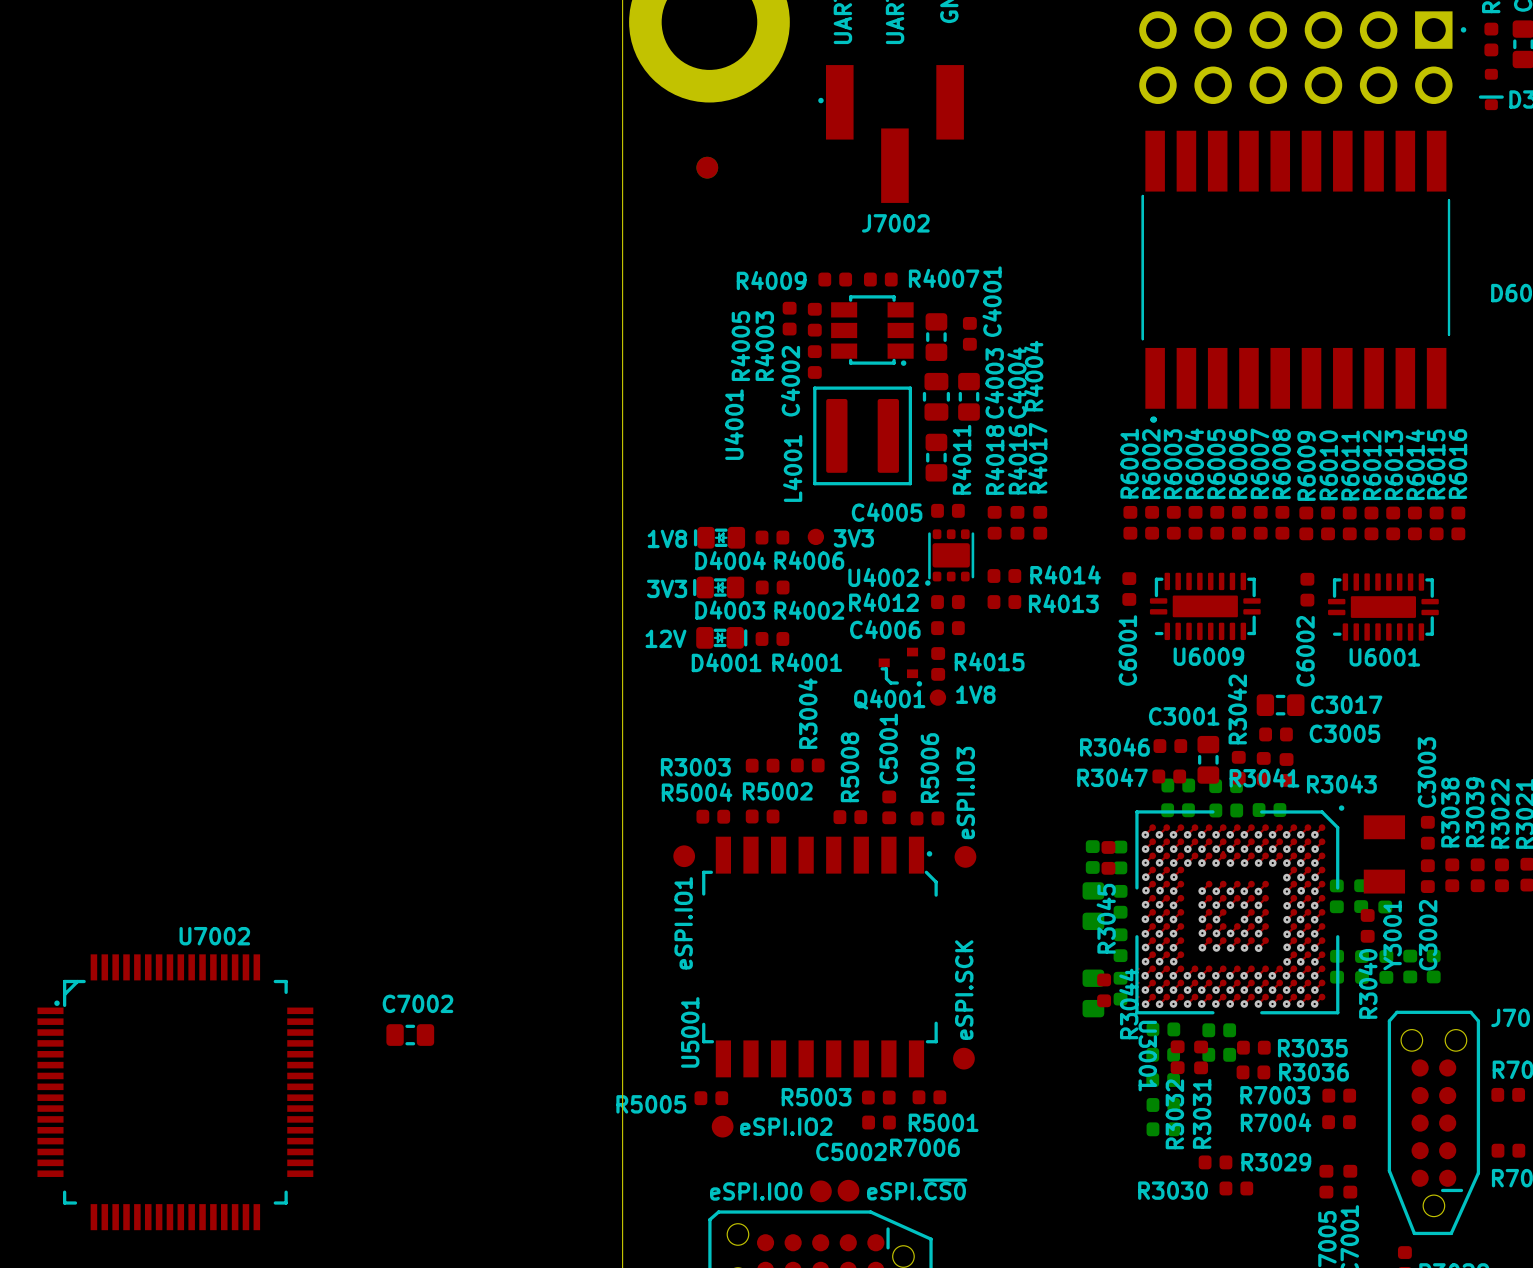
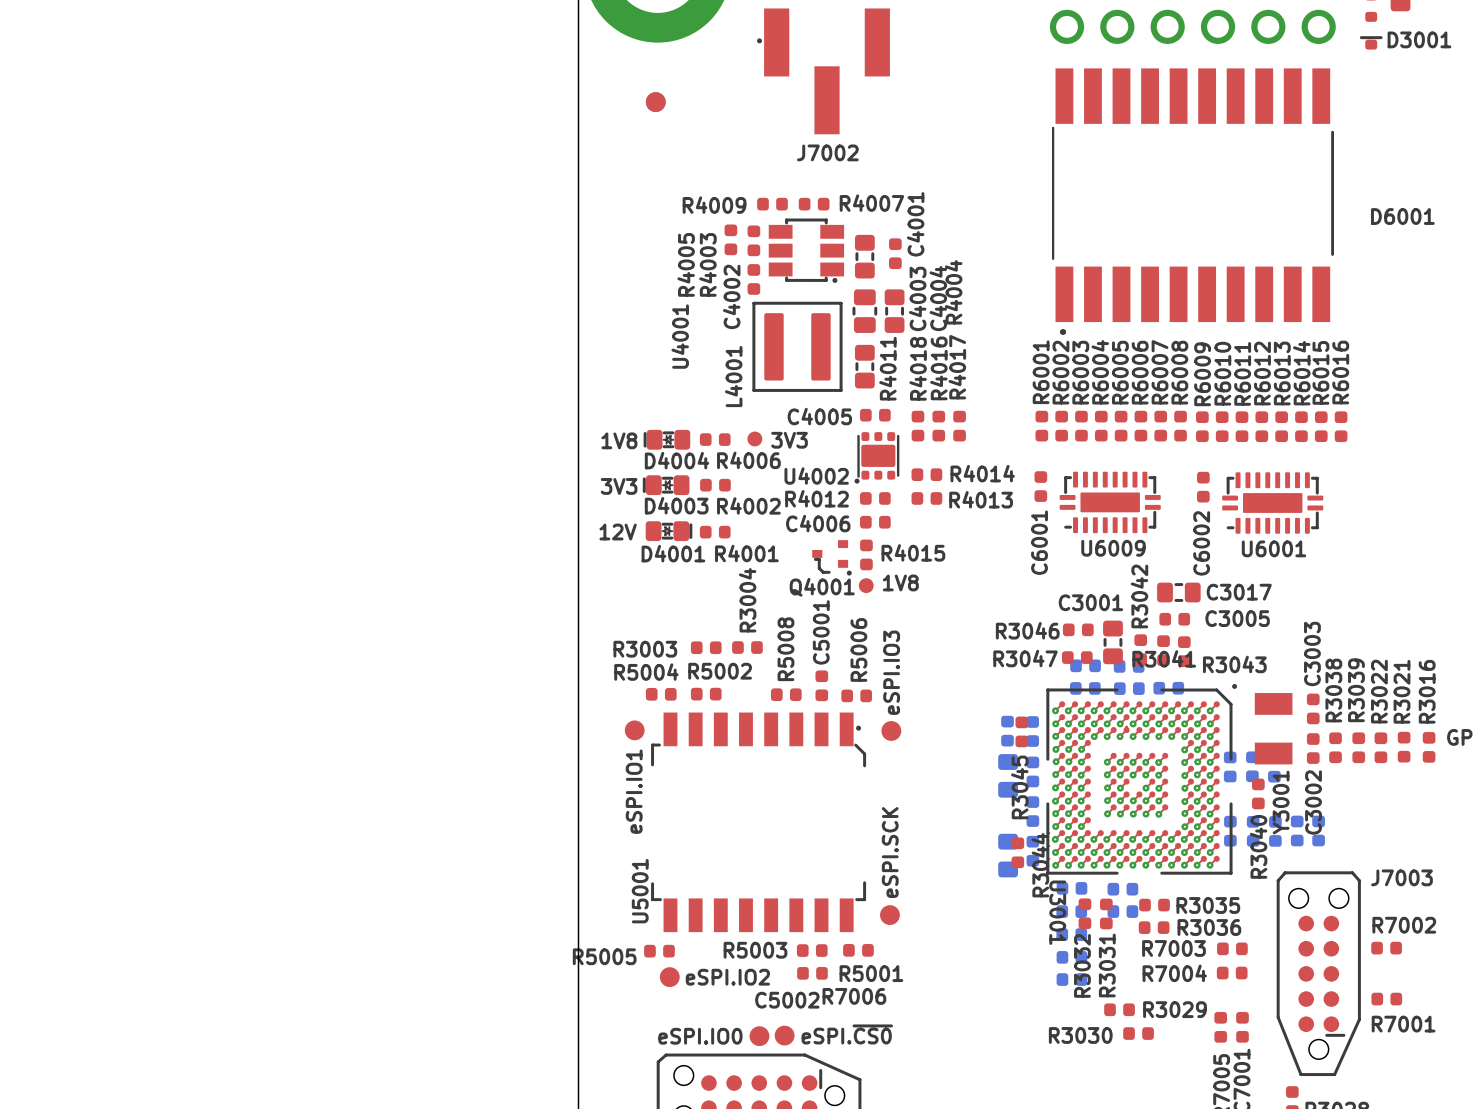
C7002: (410, 1035) -> none
U7002: (175, 1092) -> none

